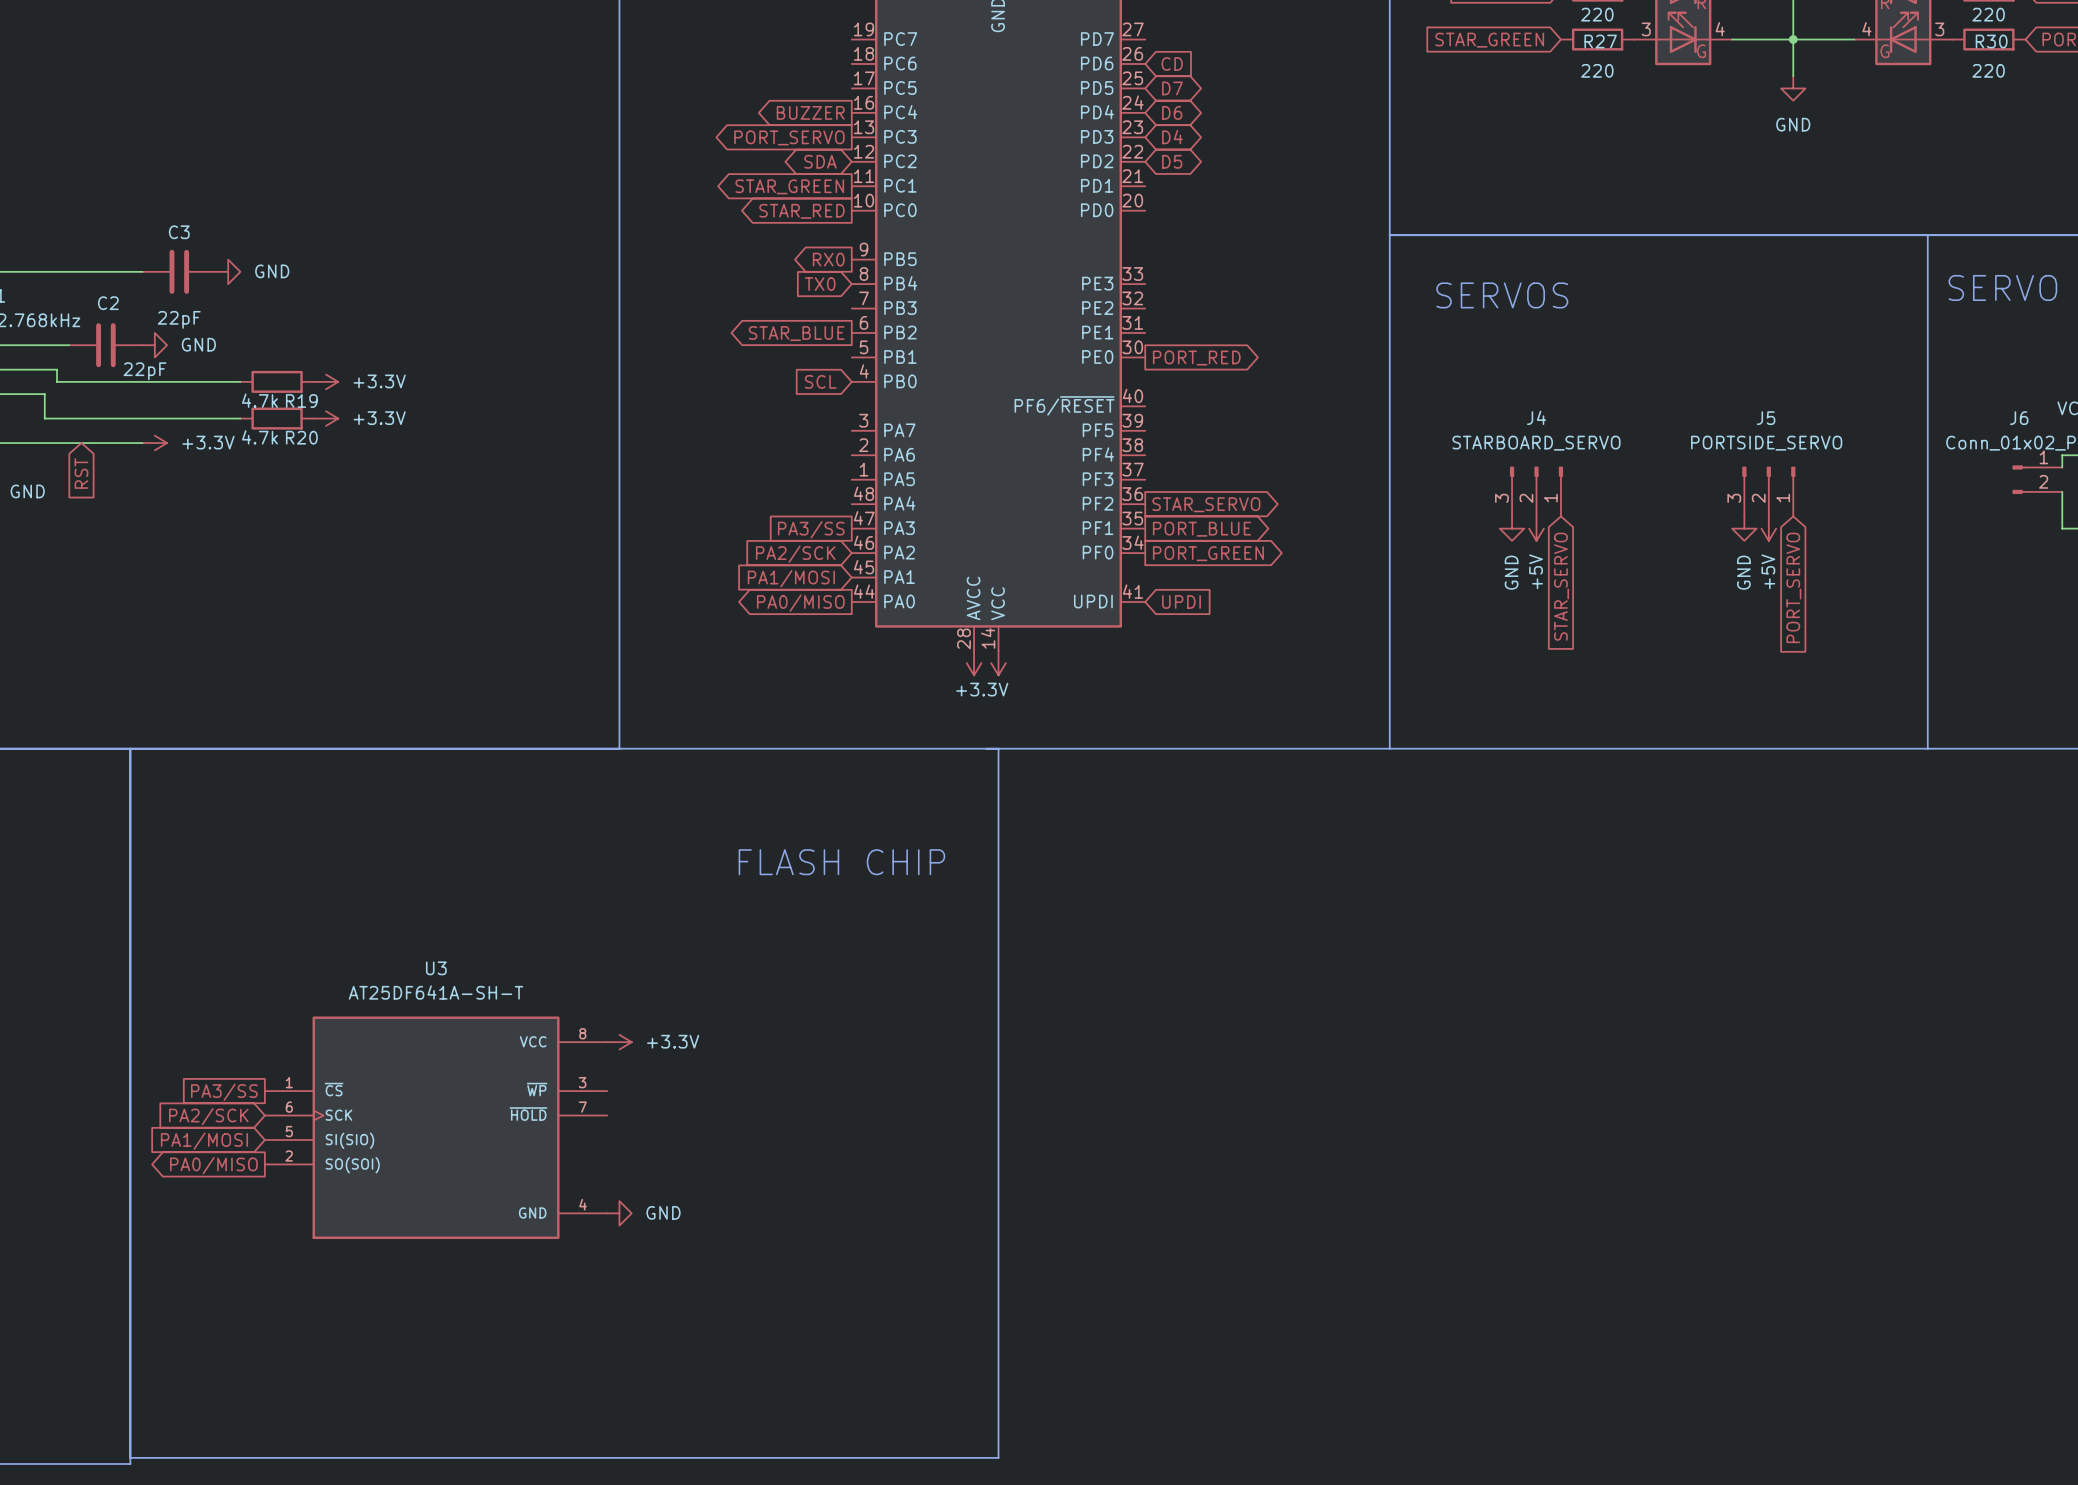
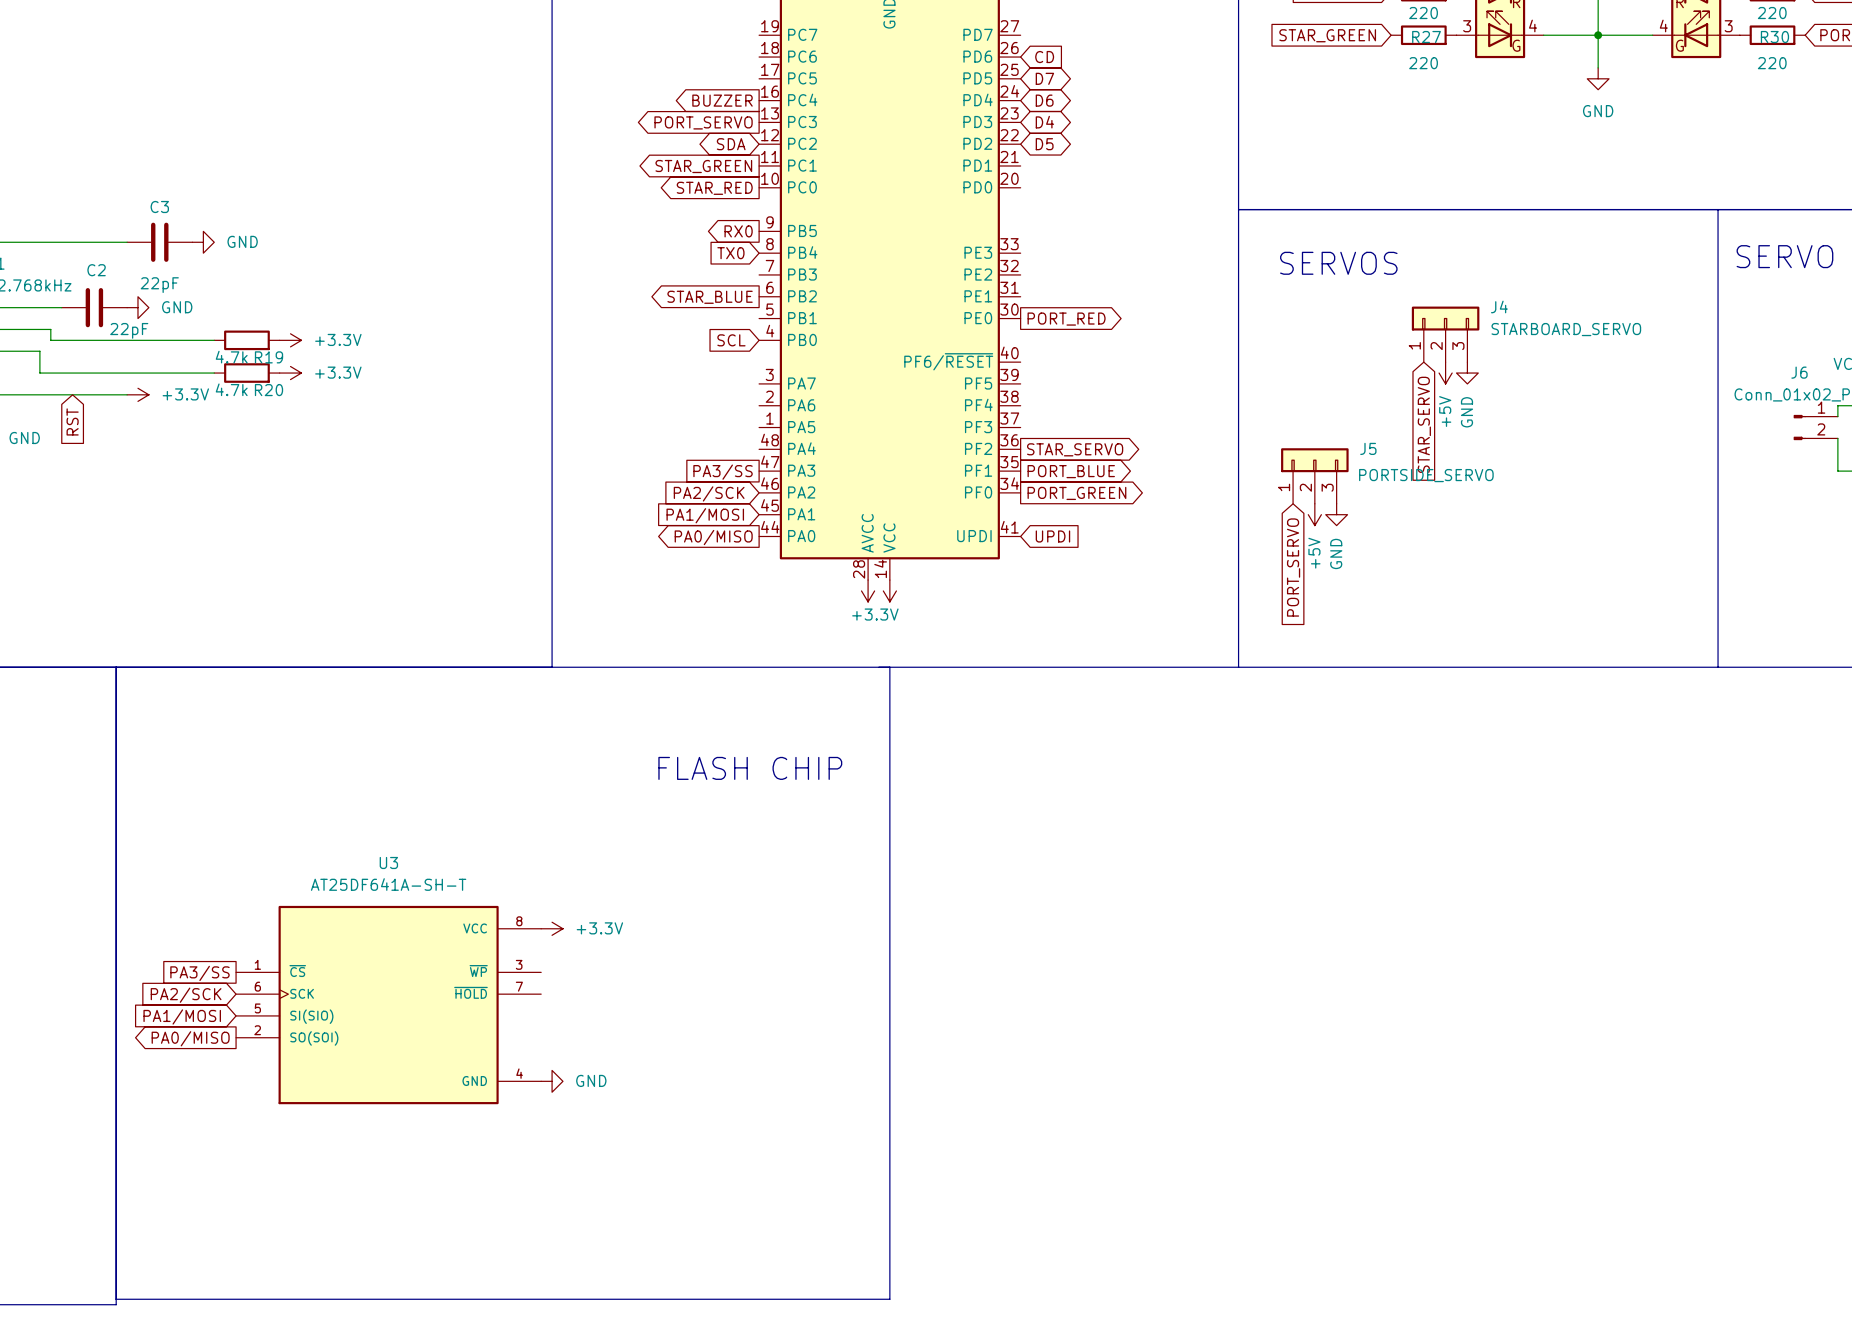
J4 name position: J4 (1536, 417) -> J4 (1499, 306)
power symbol: none -> +5V (1445, 373)
power symbol: none -> GND (1467, 373)
J5 name position: J5 (1766, 418) -> J5 (1368, 448)
J4 value position: STARBOARD_SERVO (1536, 443) -> STARBOARD_SERVO (1566, 329)
J5 value position: PORTSIDE_SERVO (1766, 443) -> PORTSIDE_SERVO (1426, 475)
J4 symbol: [1510, 466, 1563, 517] -> [1411, 306, 1480, 363]
J5 symbol: [1742, 466, 1796, 517] -> [1281, 448, 1349, 504]
power symbol position: GND (1512, 528) -> GND (1336, 514)
power symbol: +5V (1536, 528) -> none
power symbol: GND (1744, 528) -> none
power symbol: +5V (1768, 528) -> none
power symbol: none -> +5V (1314, 514)
global label position: STAR_SERVO (1561, 586) -> STAR_SERVO (1424, 424)
global label: PORT_SERVO (1793, 587) -> none
global label: none -> PORT_SERVO (1293, 567)

